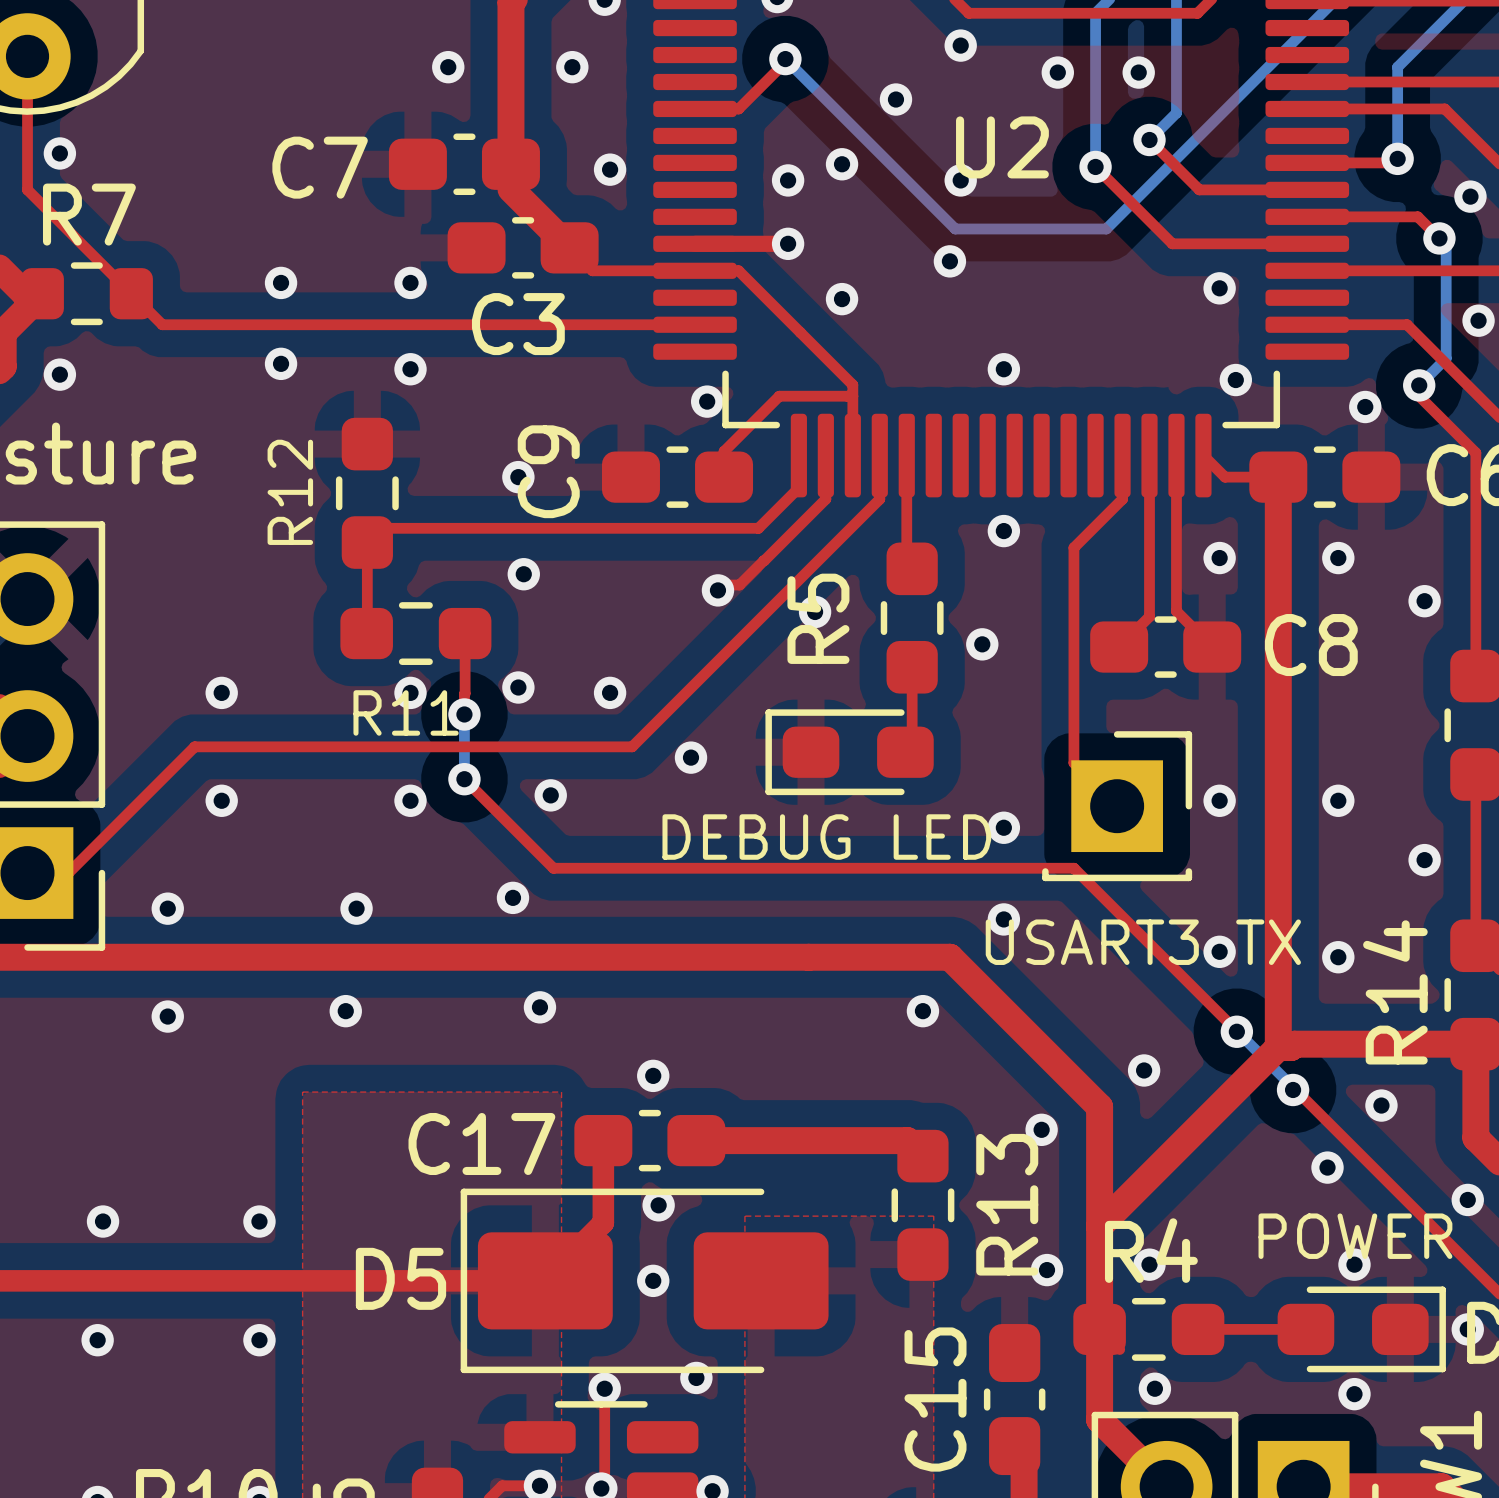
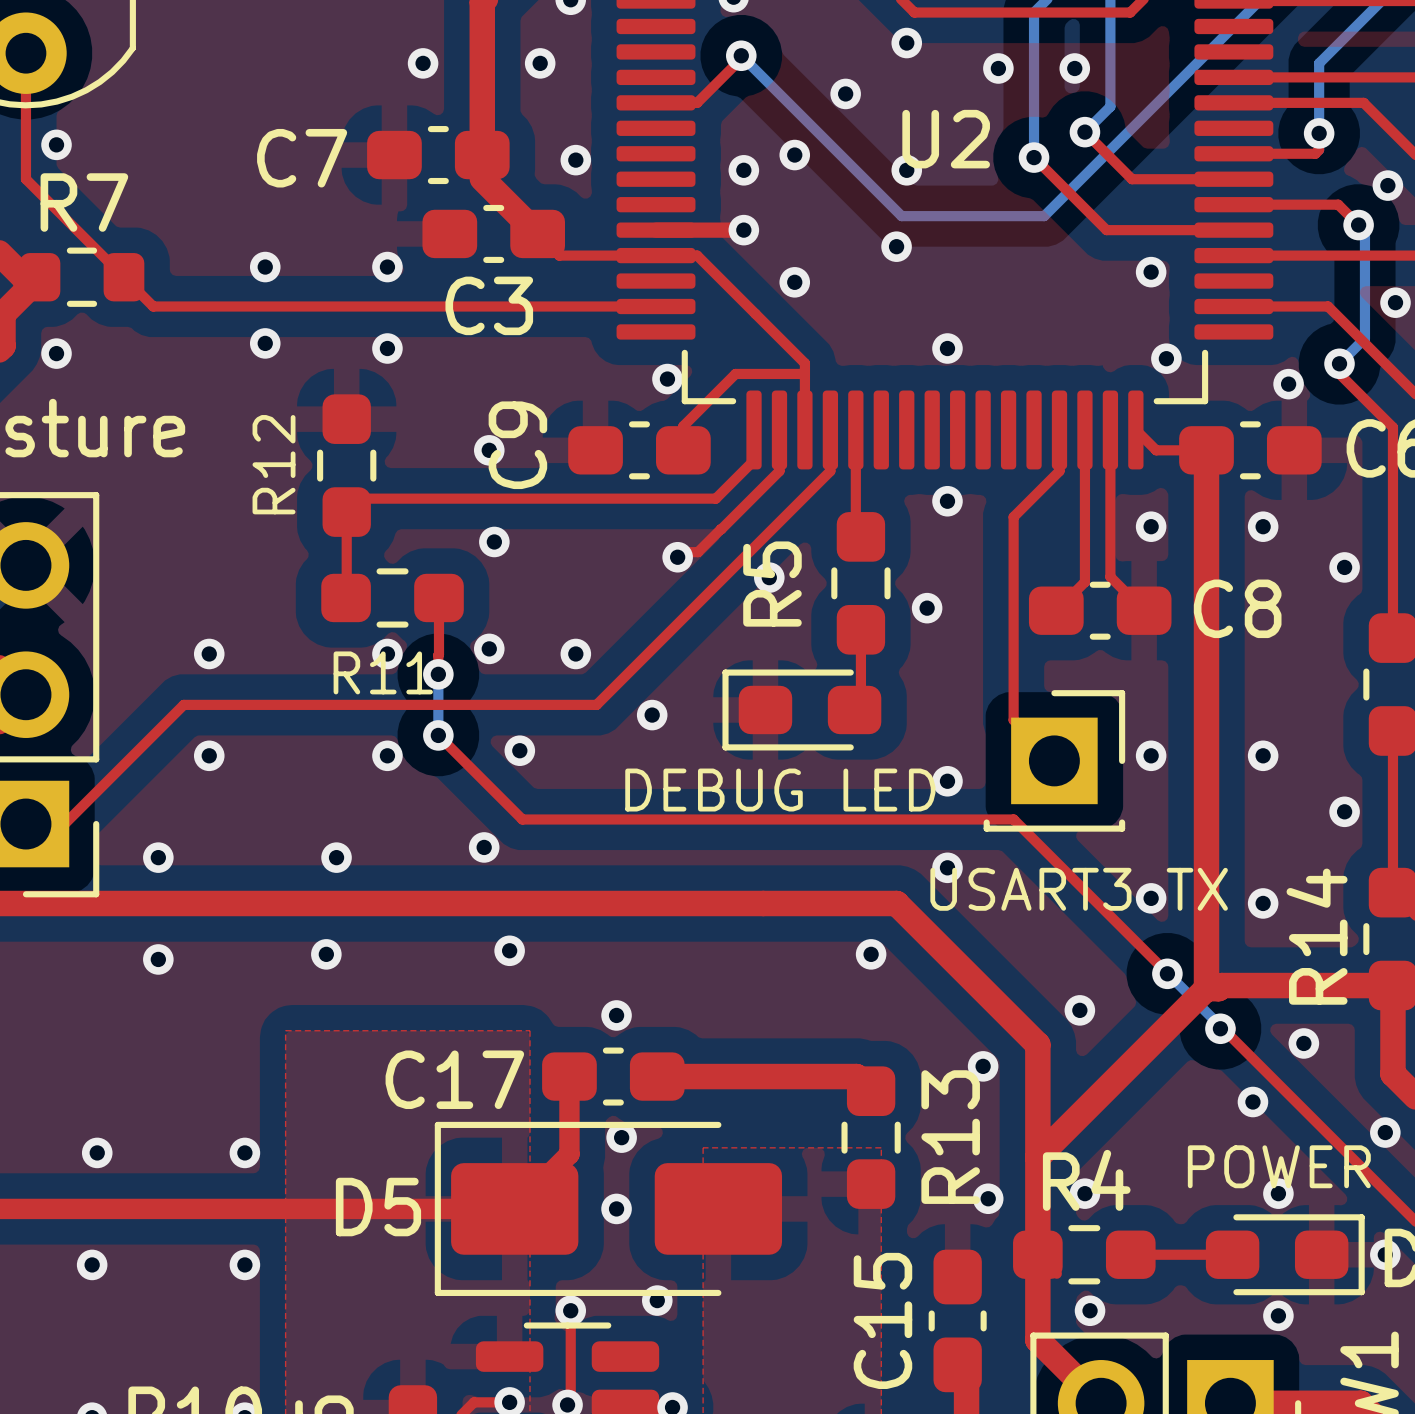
via position: (1397, 158) -> (1319, 133)

